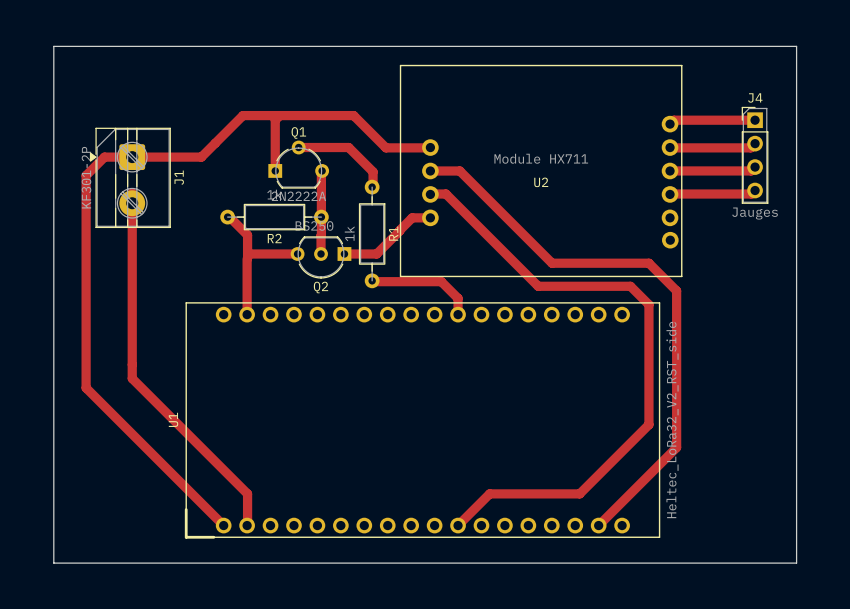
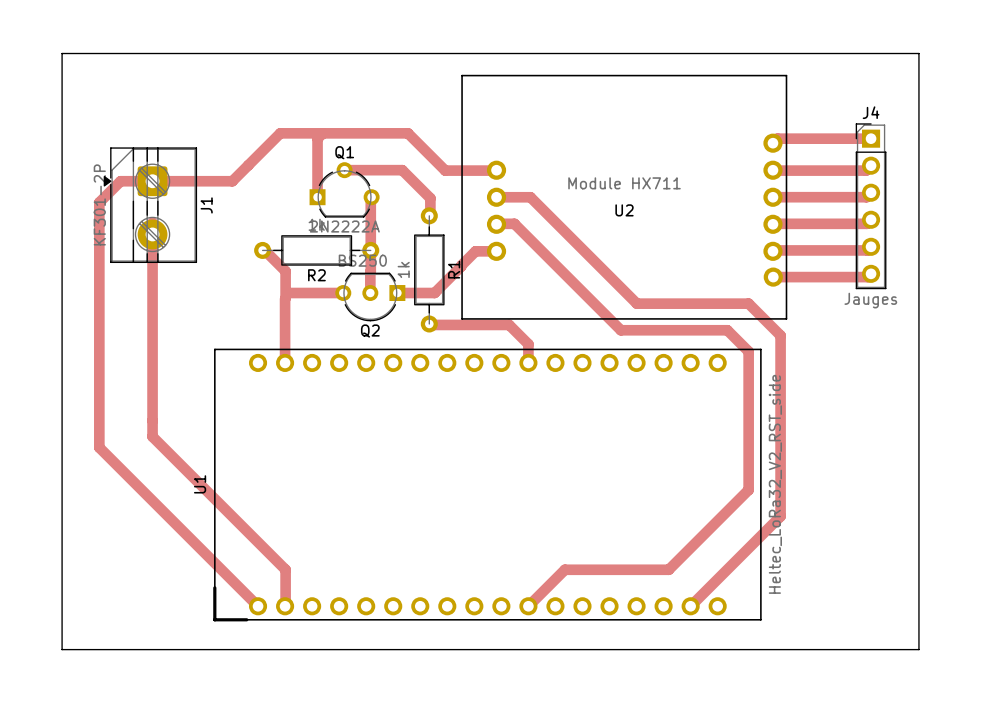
J4 footprint: [741, 106, 769, 204] -> [855, 123, 887, 290]
track: none -> (871, 246) (867, 250) (773, 250)
J4 value position: Jauges (755, 213) -> Jauges (870, 300)
track: none -> (871, 273) (867, 277) (773, 277)

